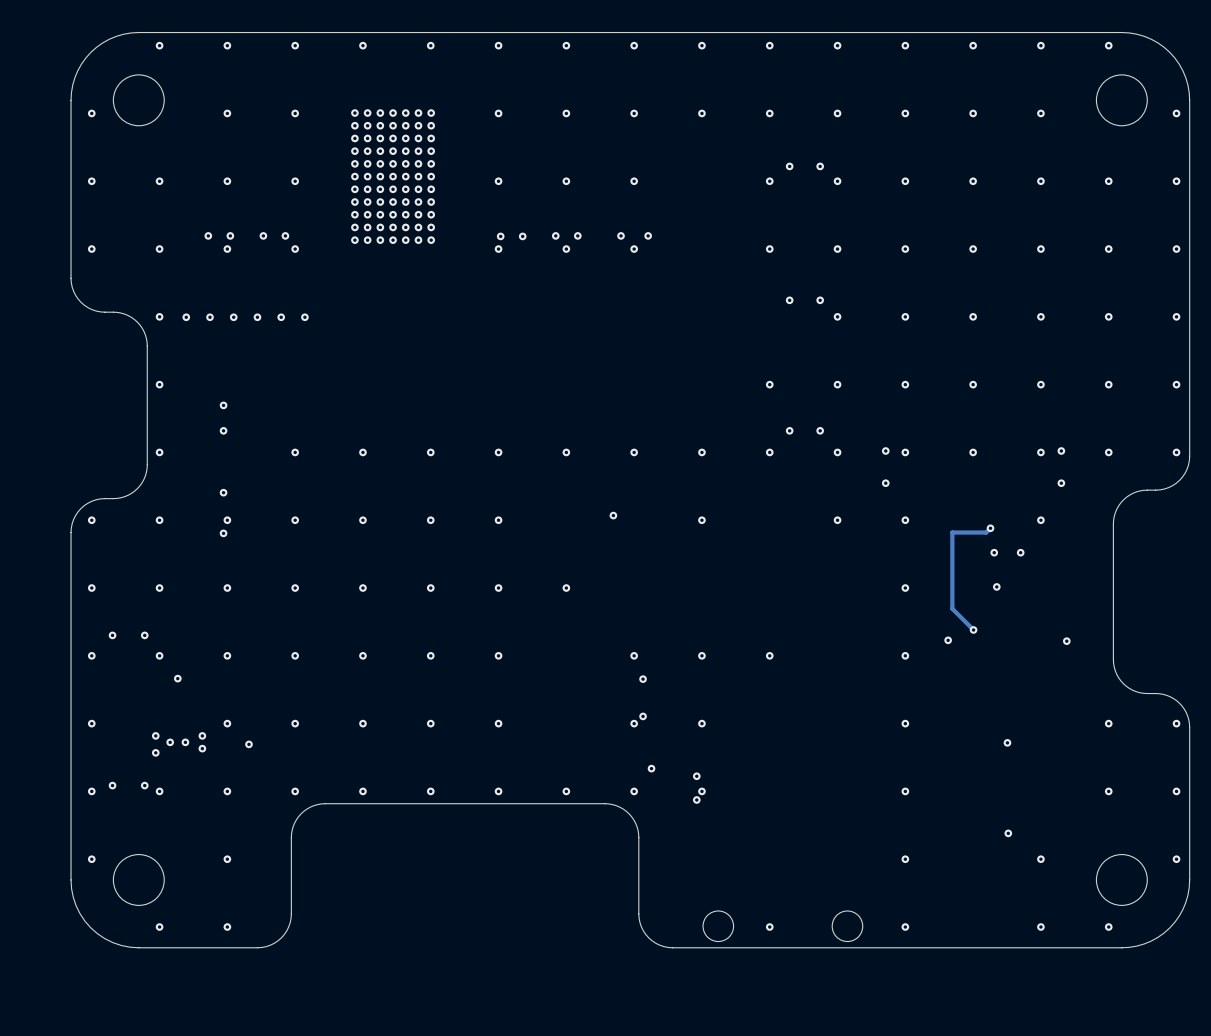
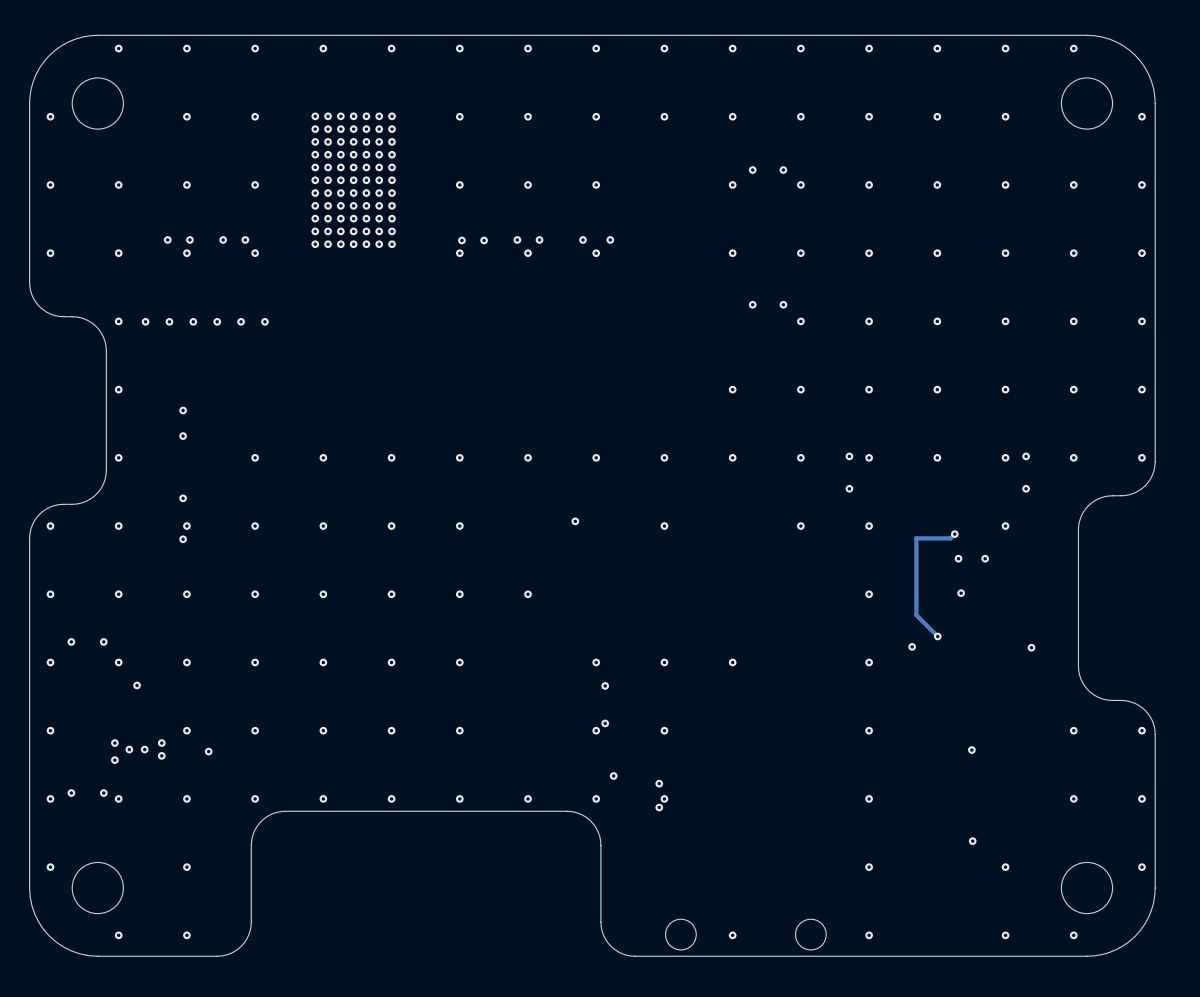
via: (789, 430) -> none
via: (820, 430) -> none

